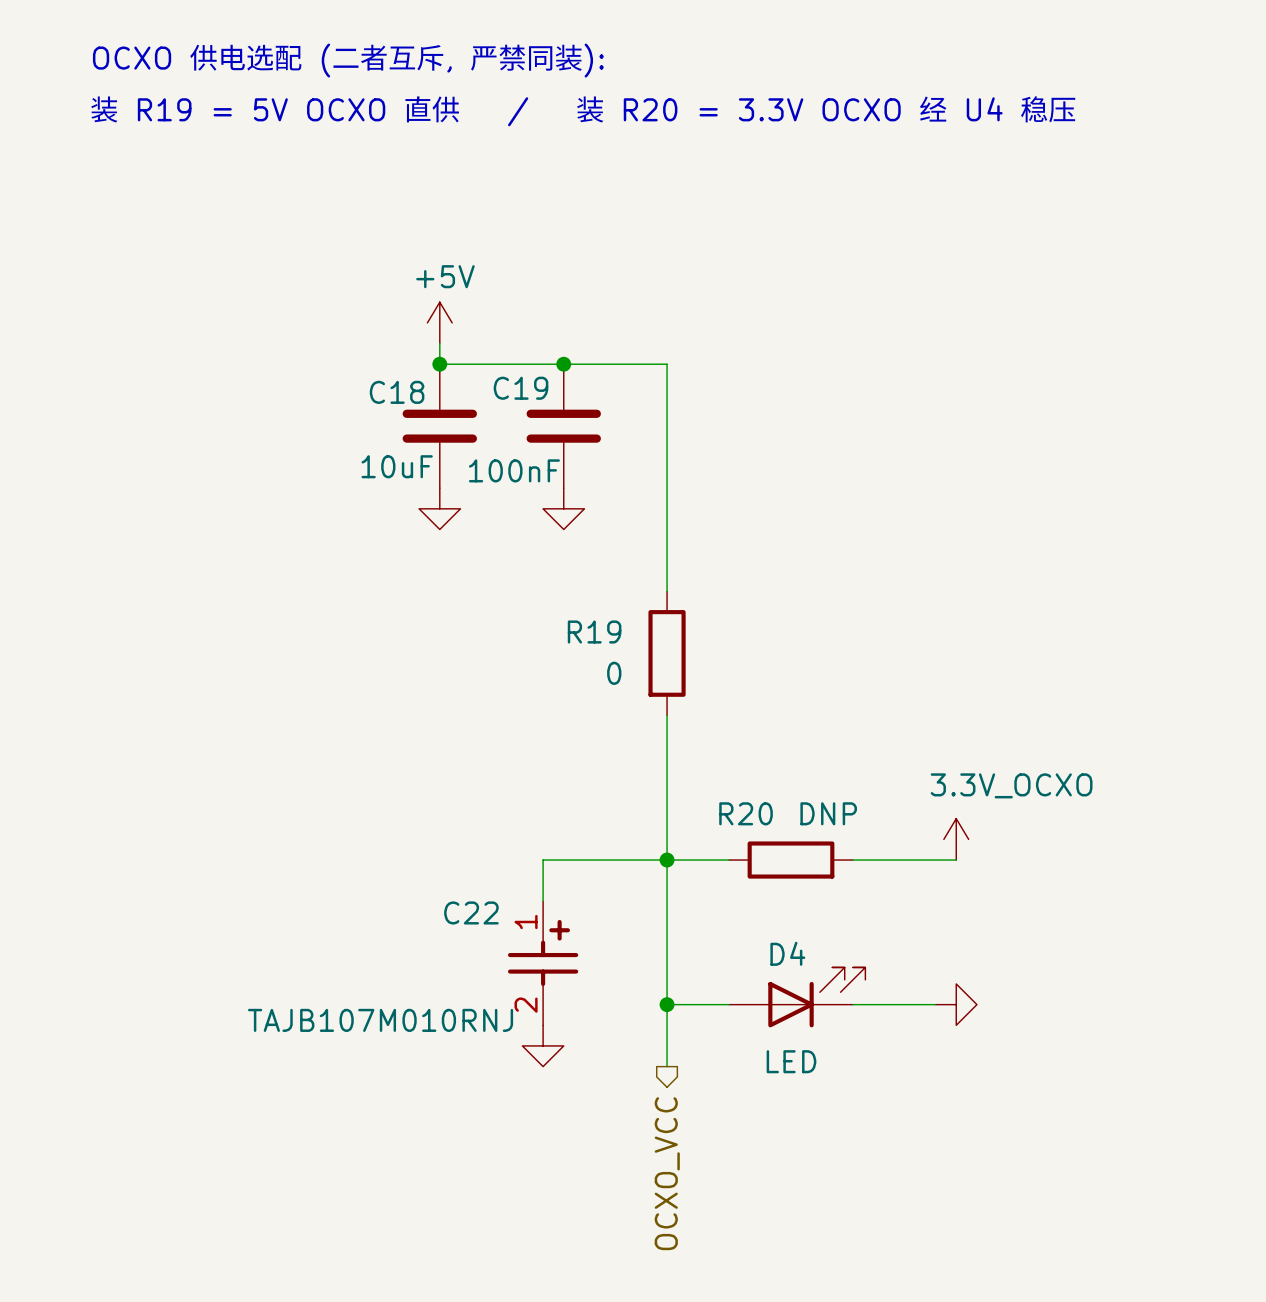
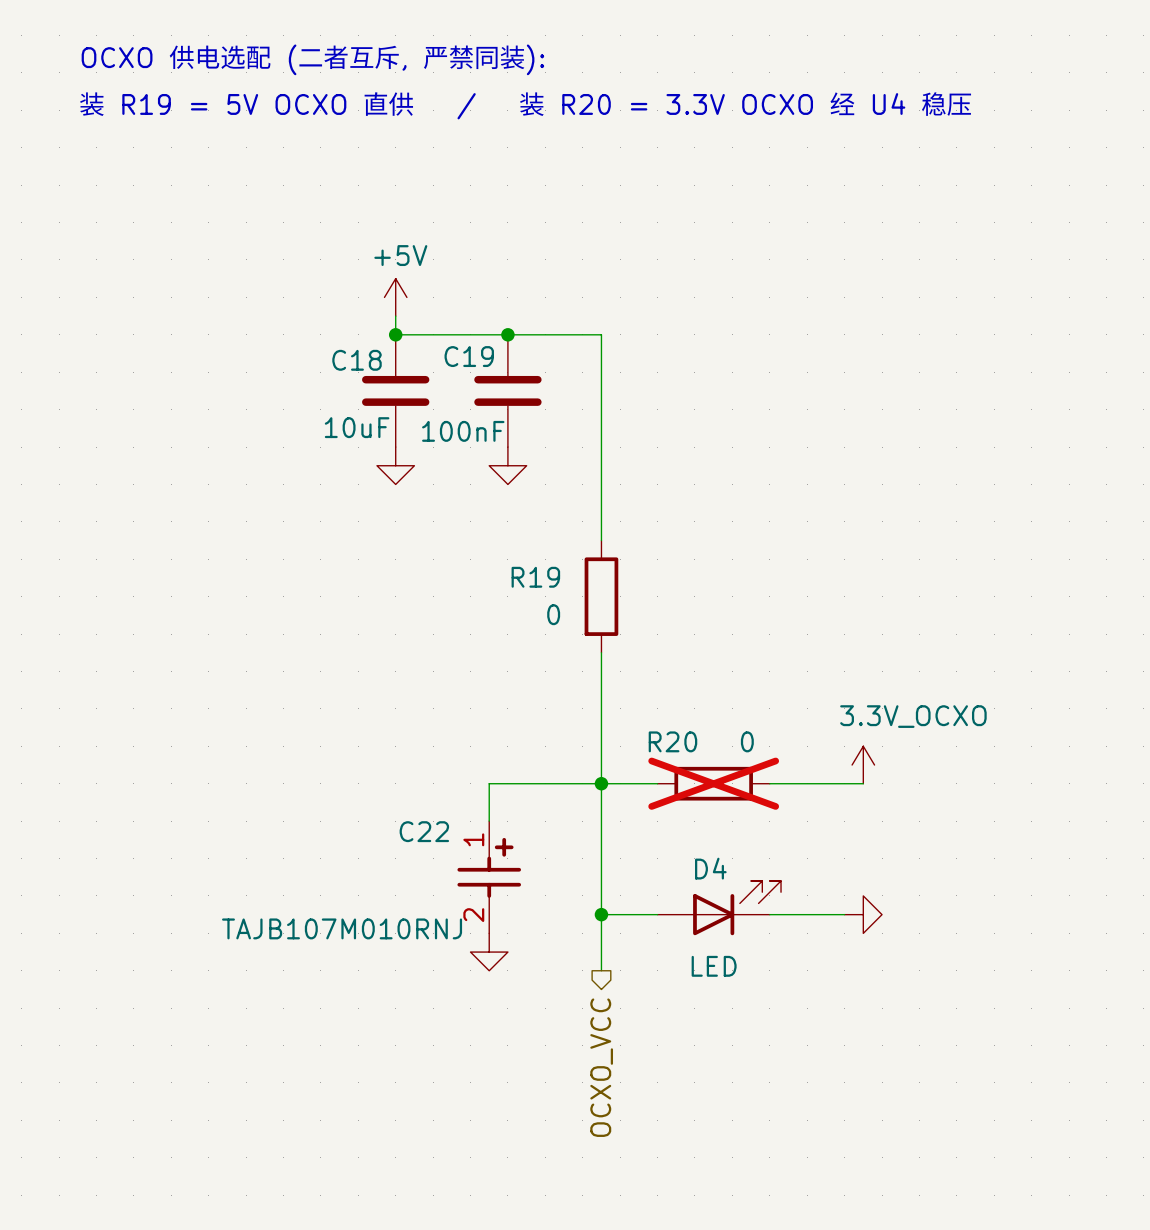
R20 value: DNP (828, 813) -> 0 (747, 741)
R20 do-not-place cross: none -> (713, 783)

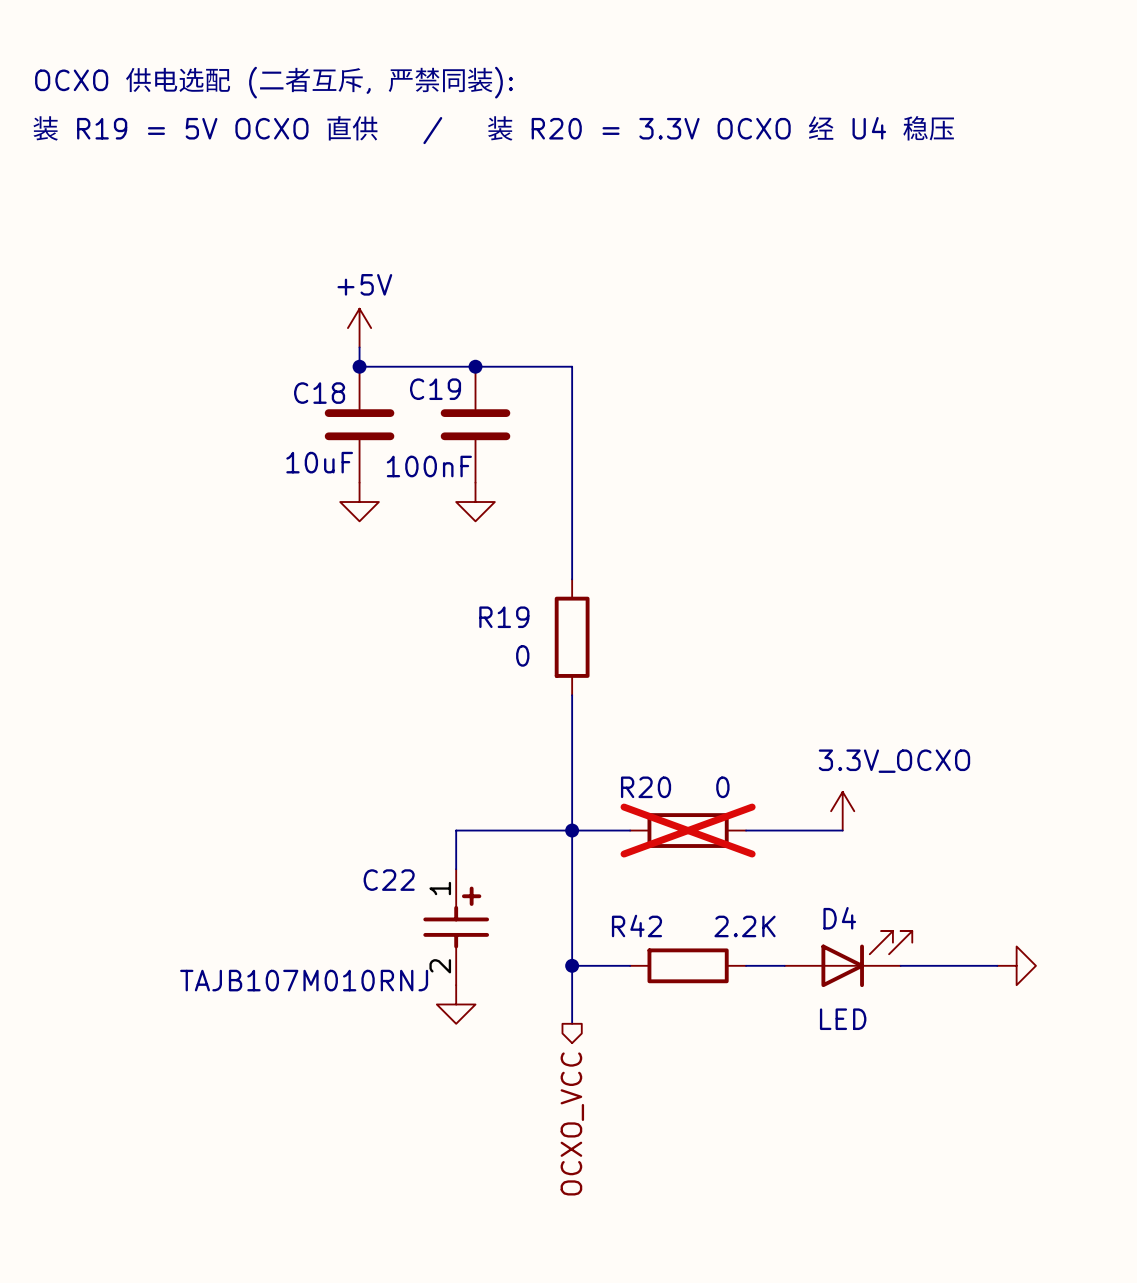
D4 position: (719, 908) -> (848, 959)
R42: none -> 2.2K (688, 965)
power symbol position: (863, 914) -> (1016, 965)
wire: none -> (900, 965) (997, 965)

